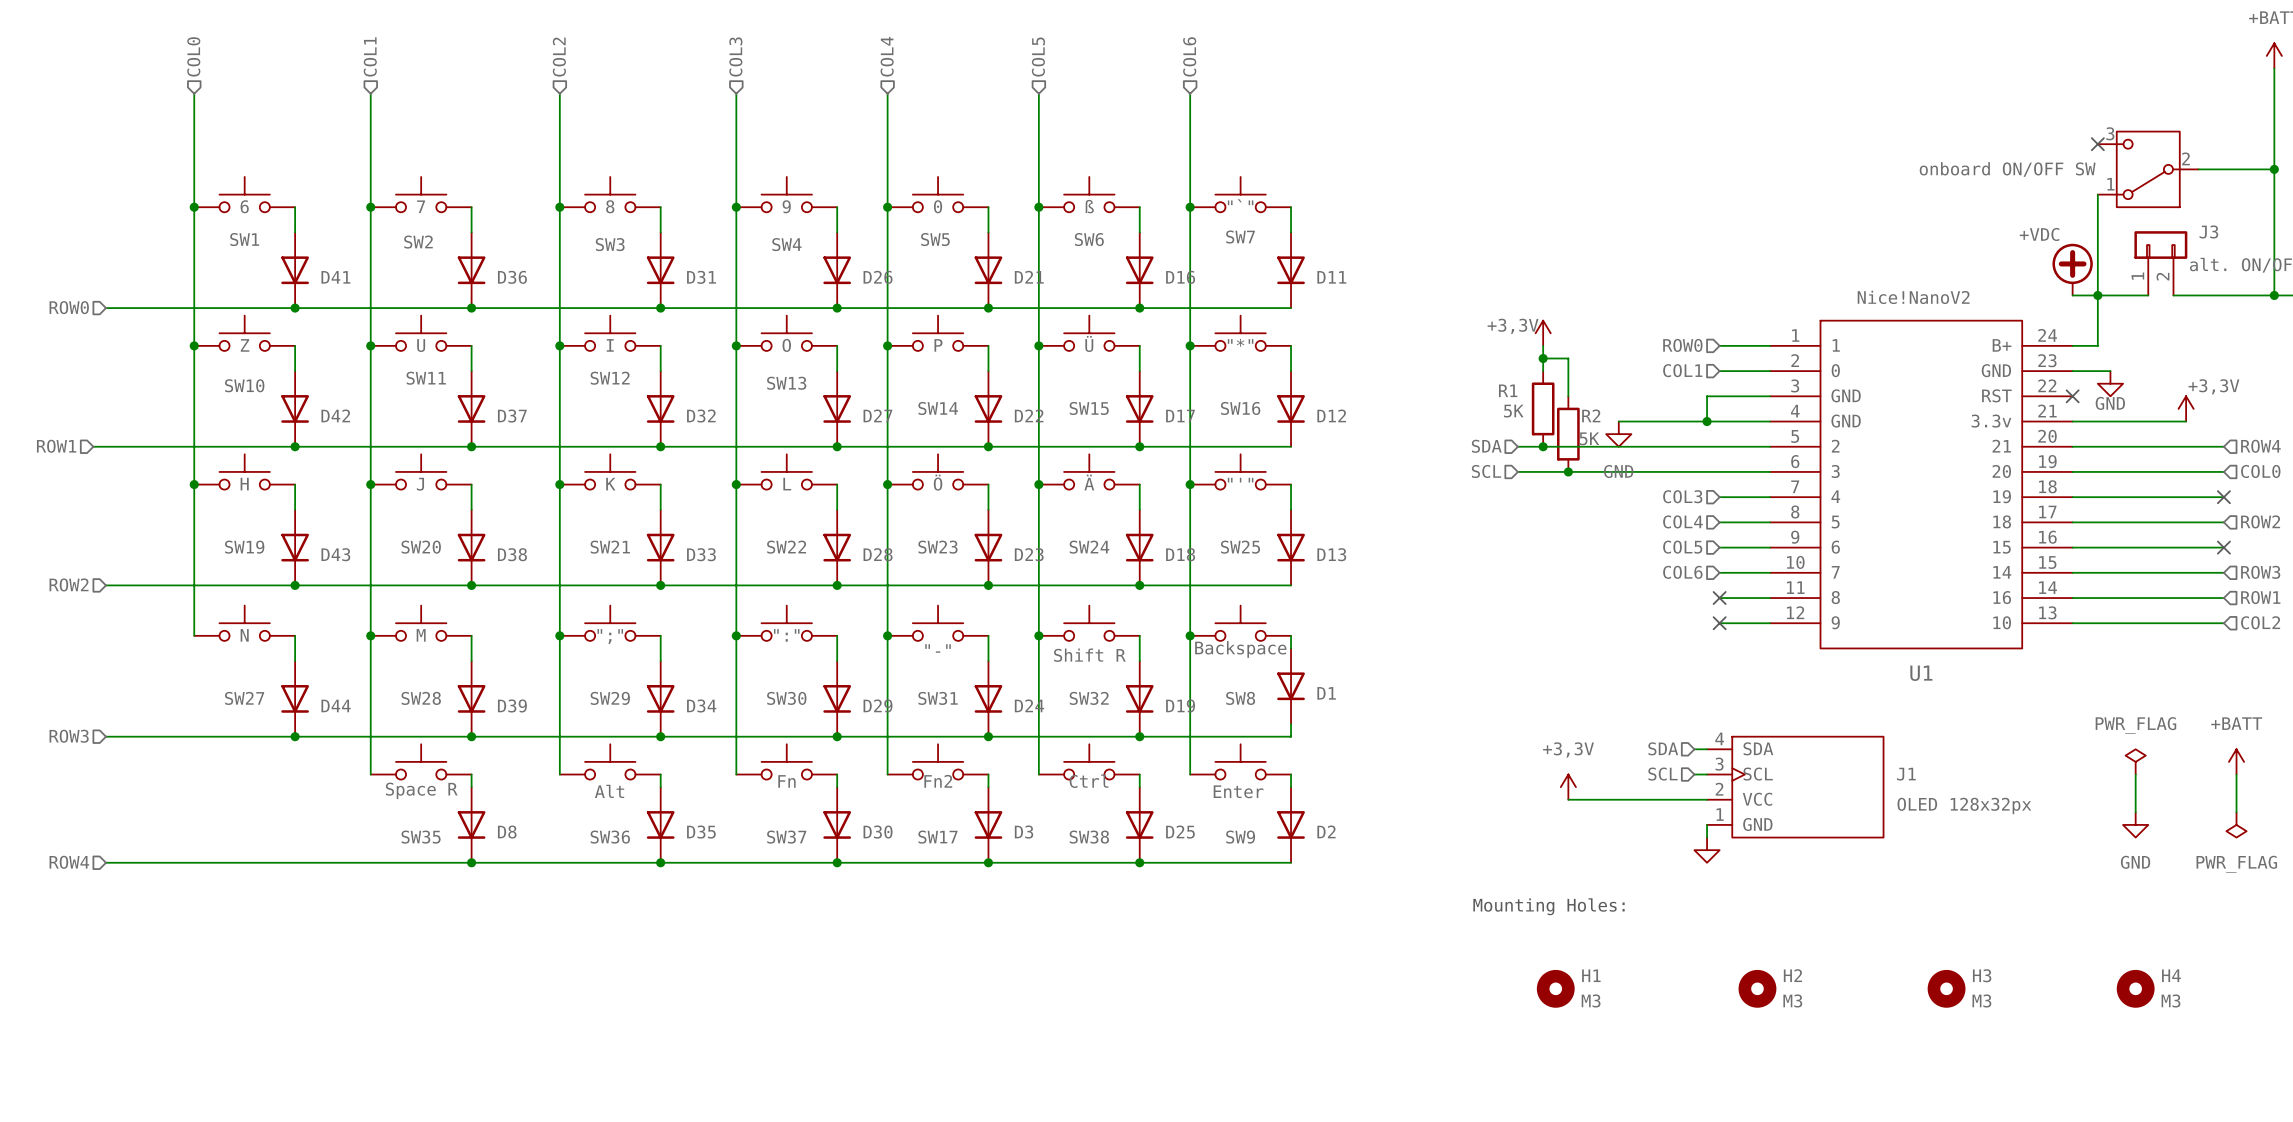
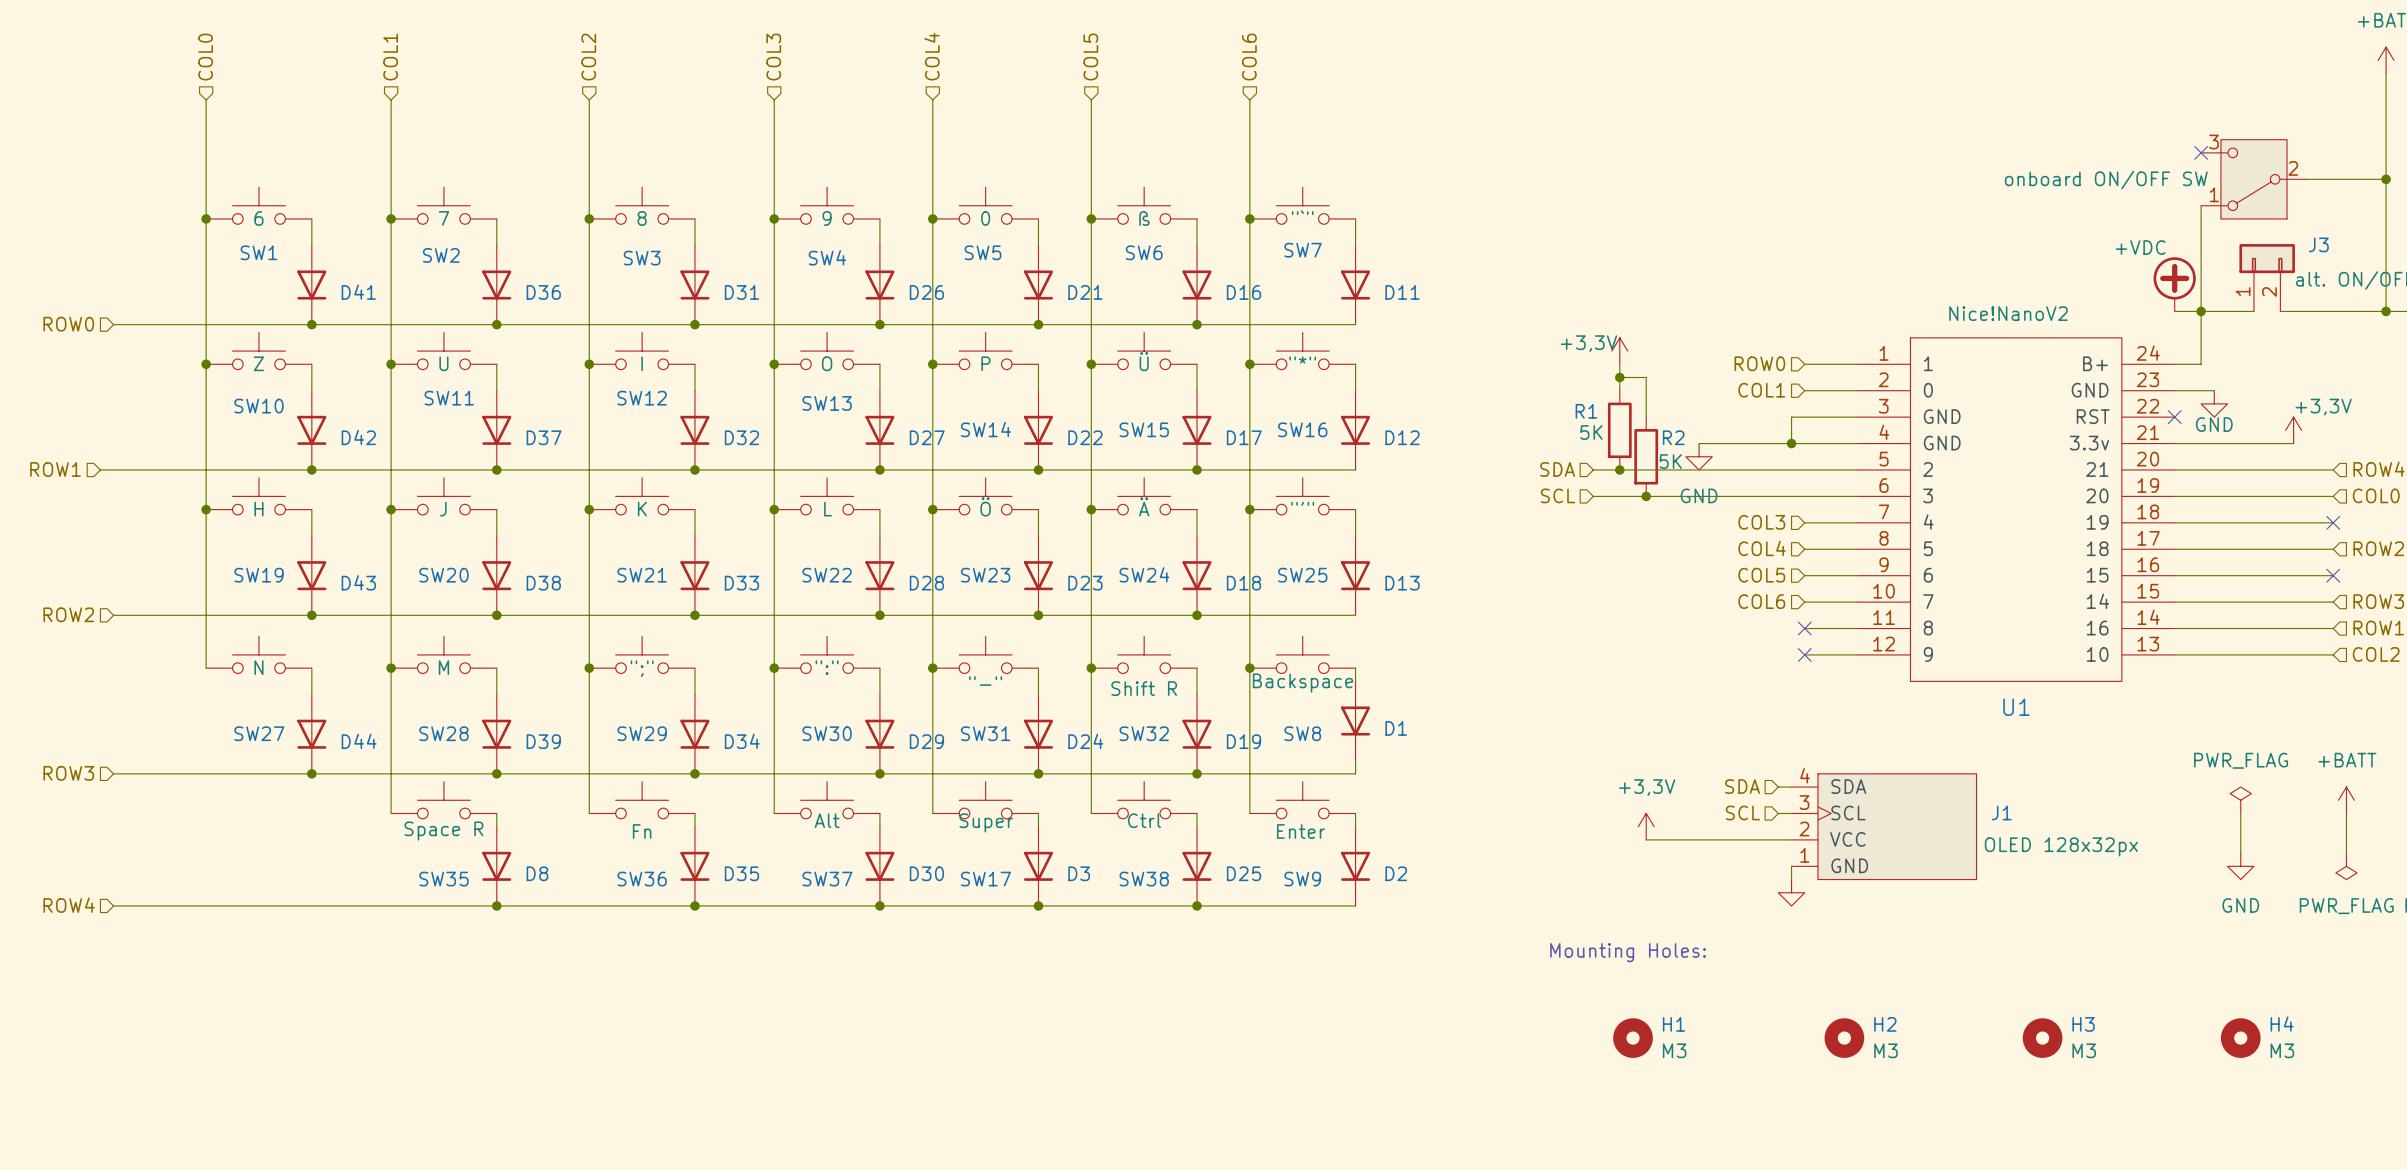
SW37 text: Fn (786, 781) -> Alt (827, 820)
SW17 text: Fn2 (938, 781) -> Super (986, 822)
SW36 text: Alt (609, 791) -> Fn (642, 831)

